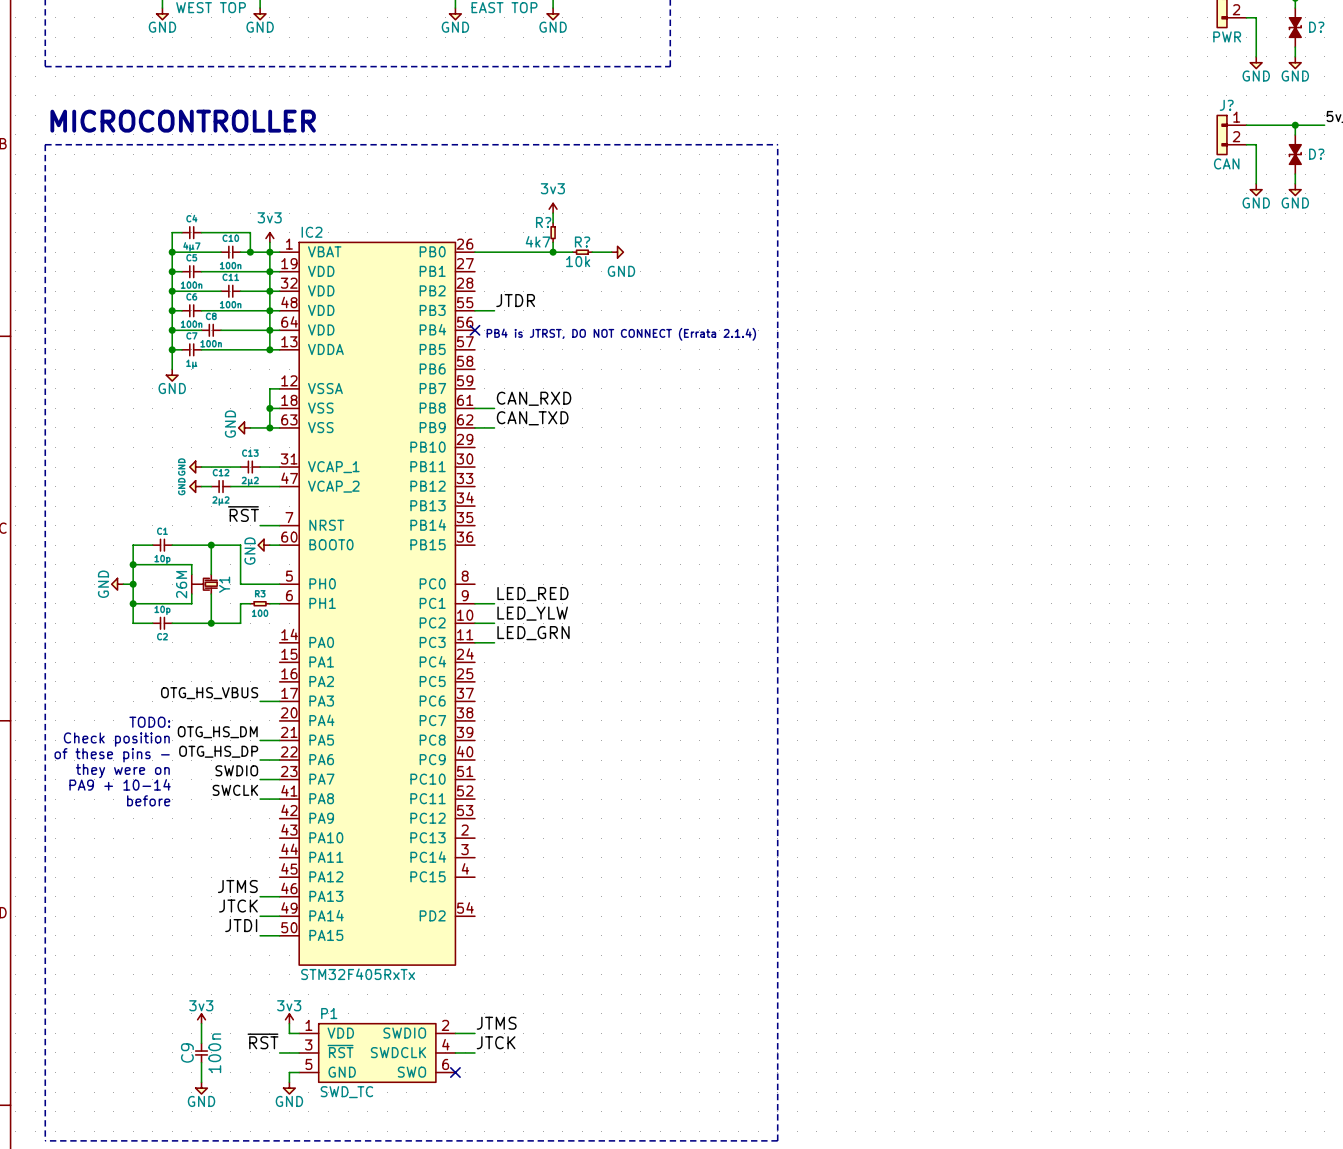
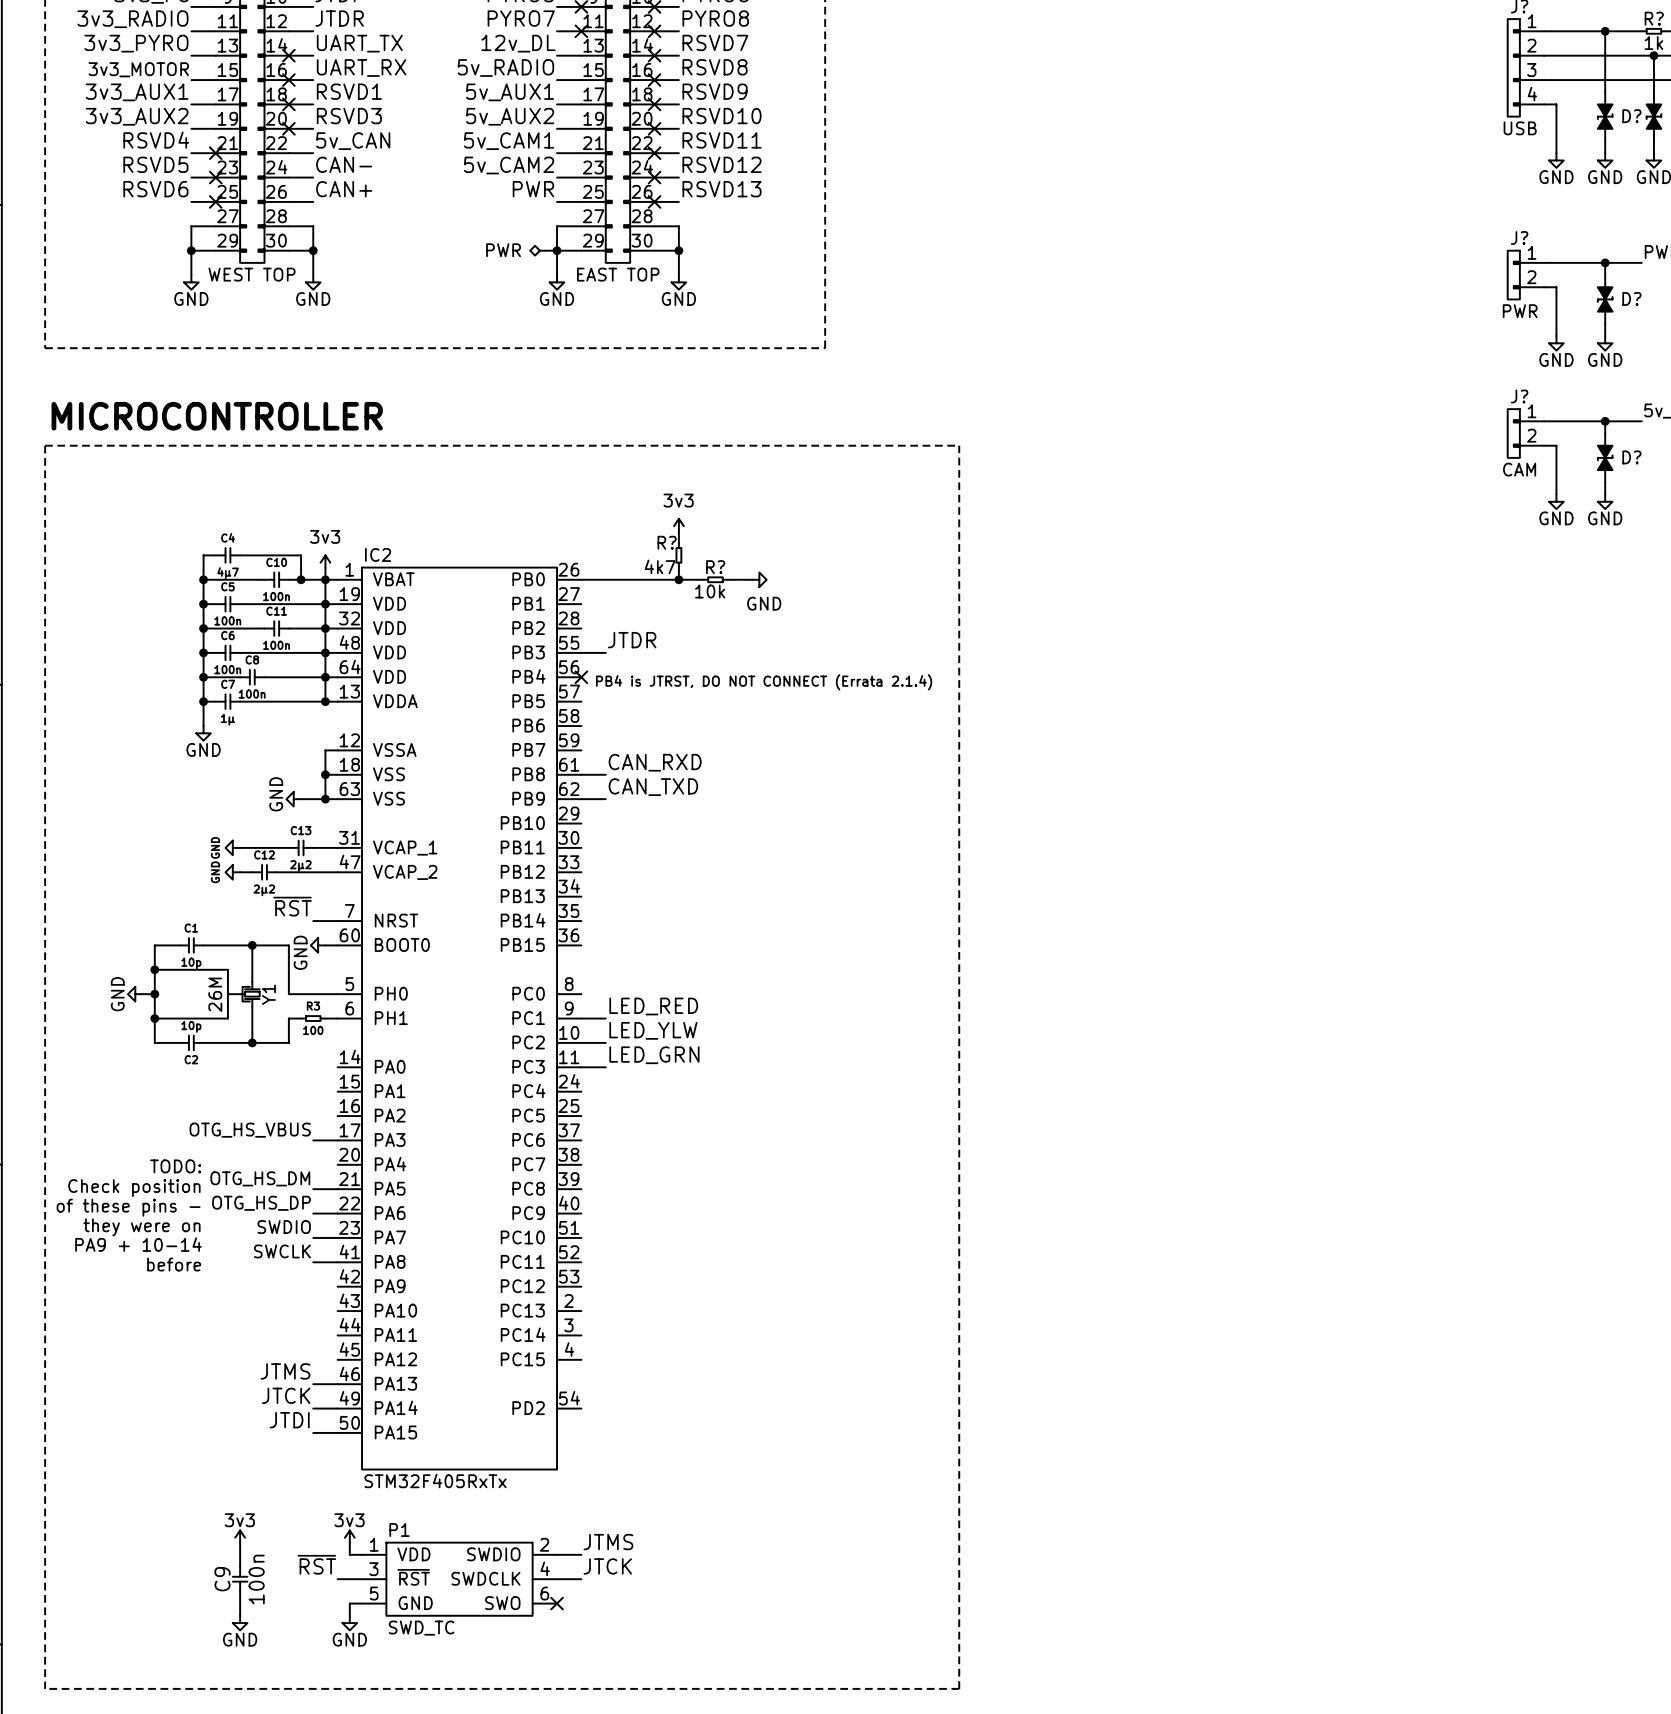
J? value: CAN (1226, 163) -> CAM (1519, 469)

